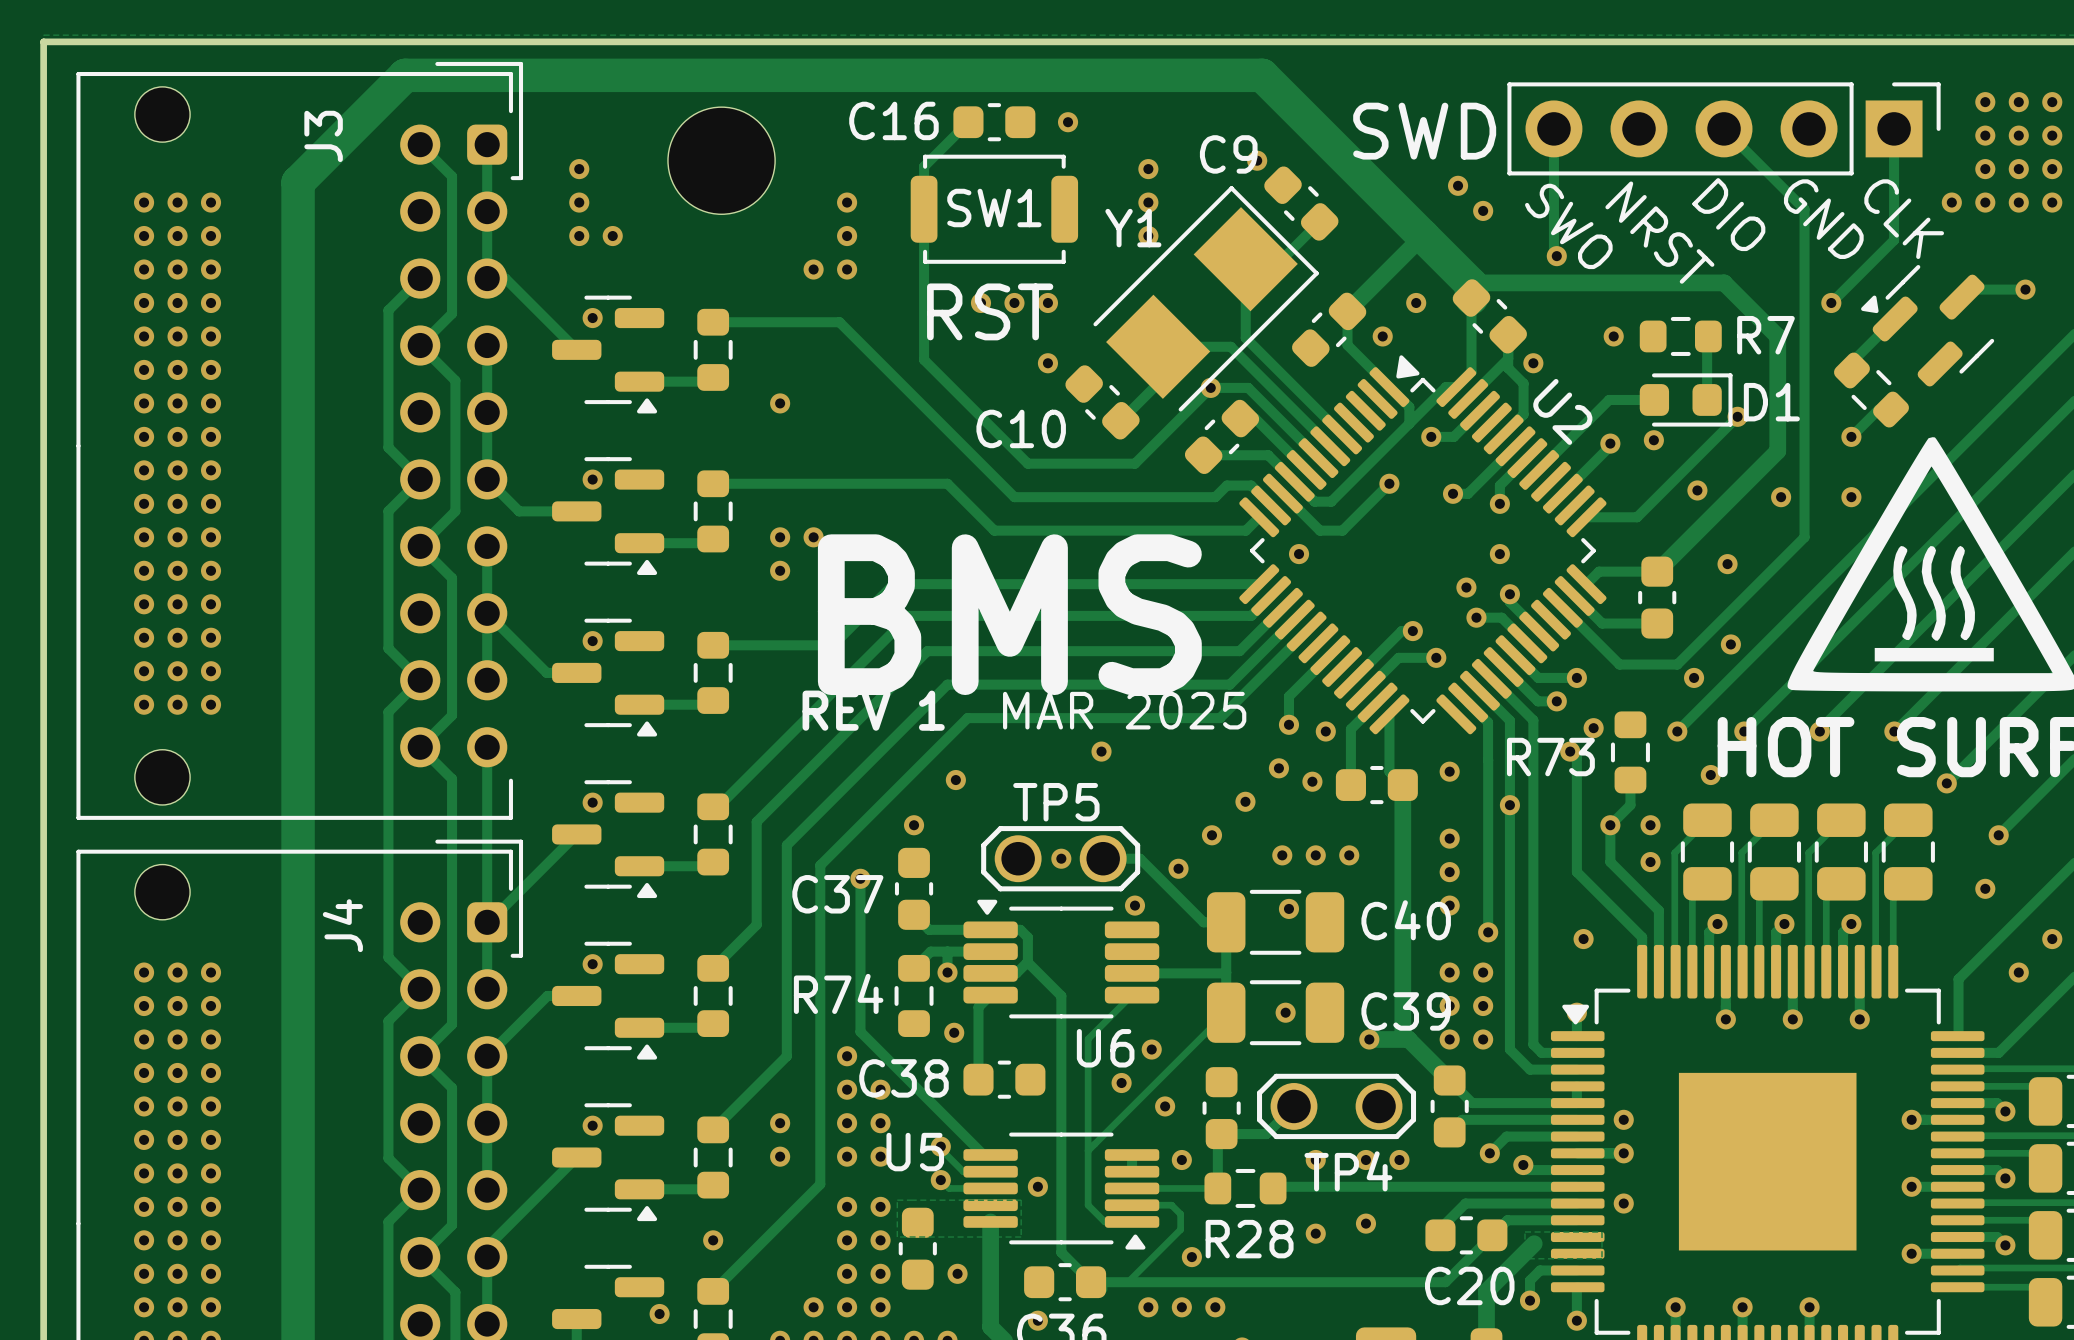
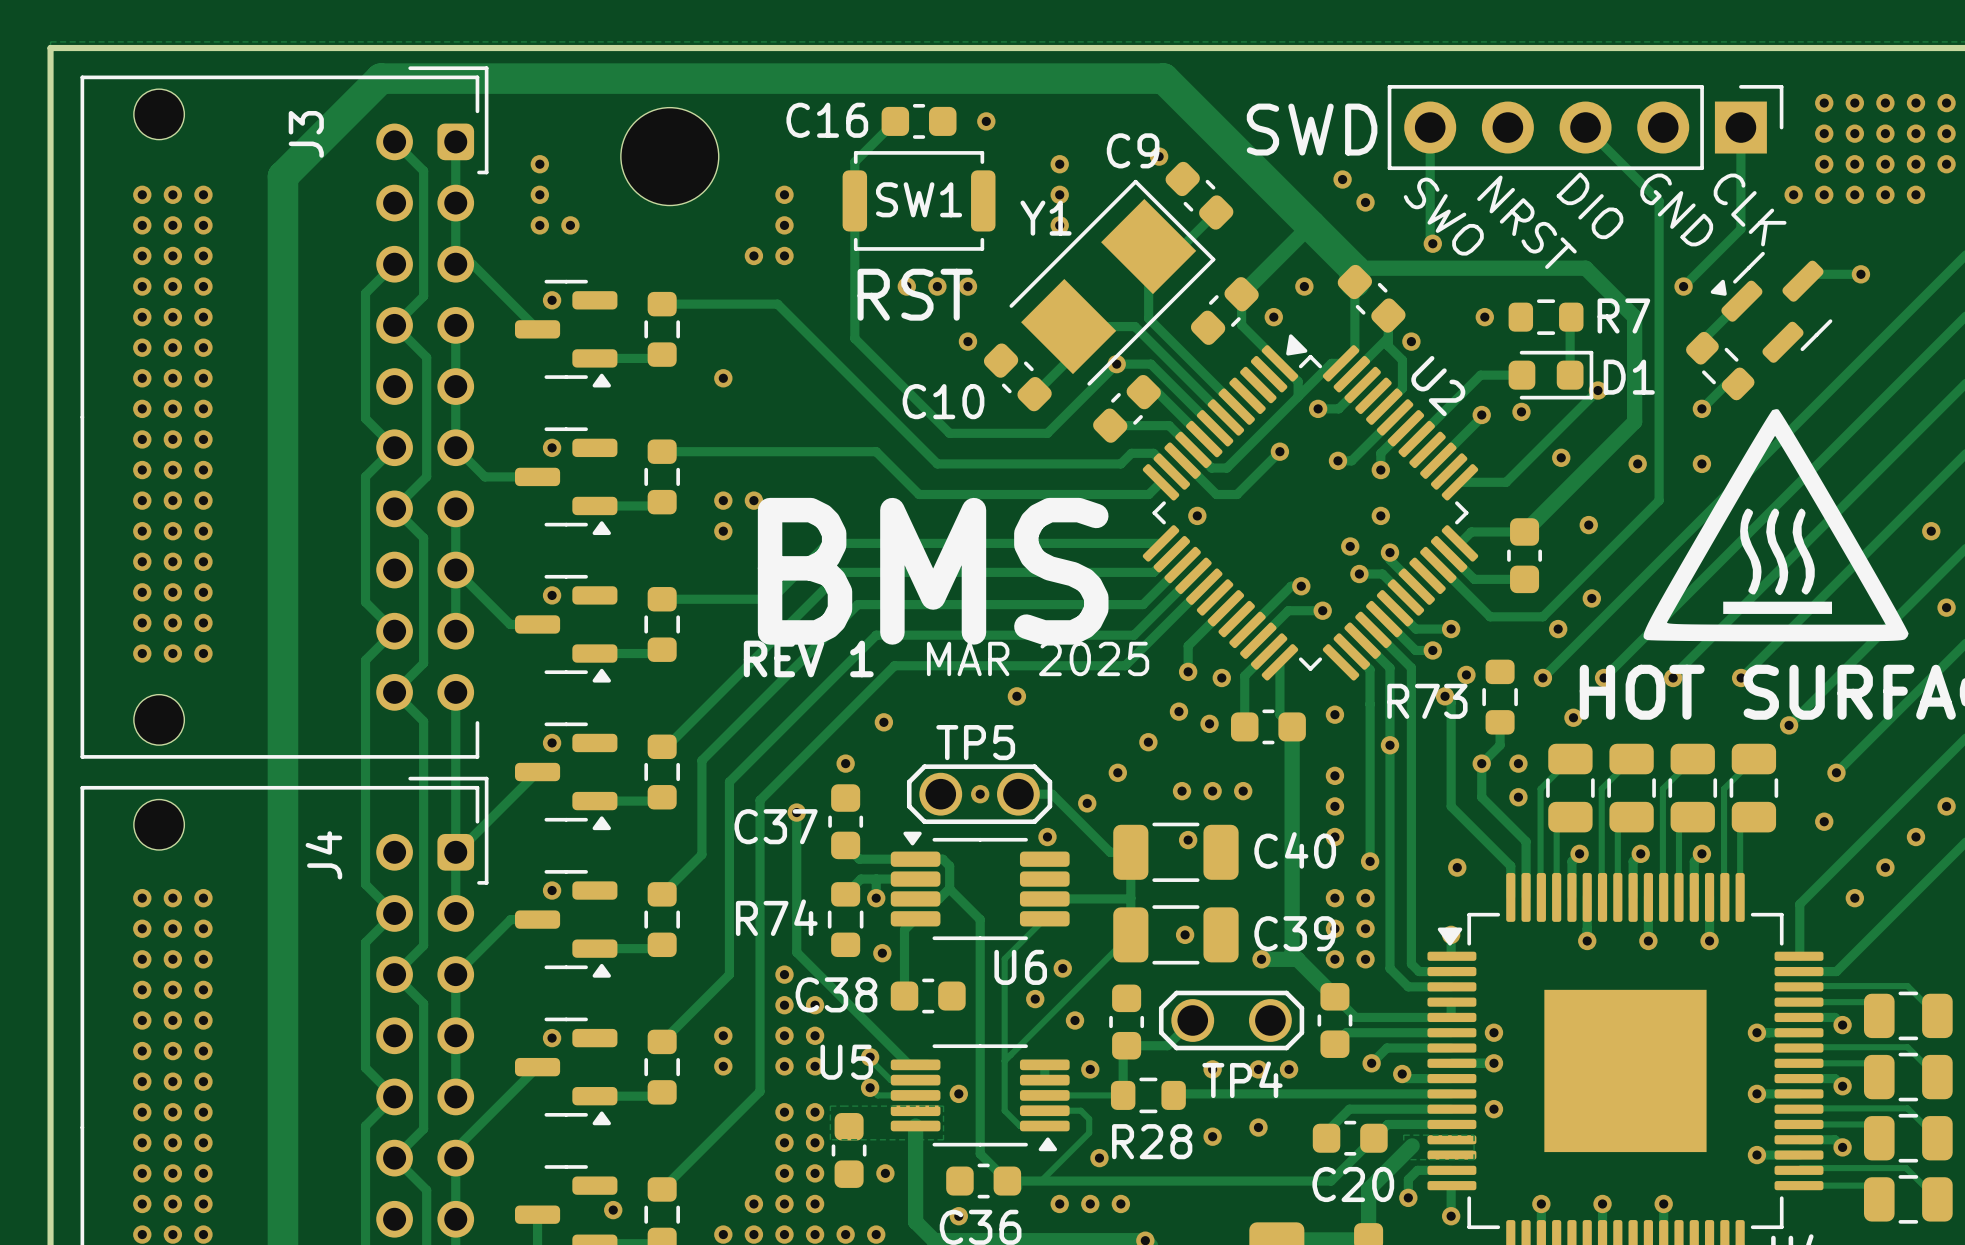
via: (713, 1240) -> none

